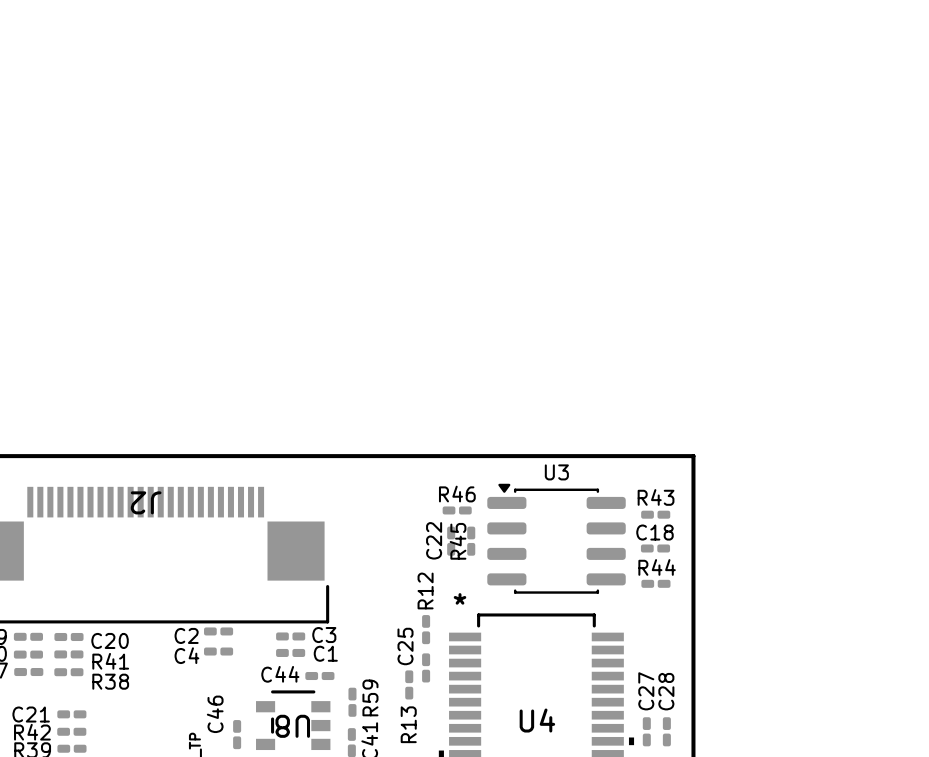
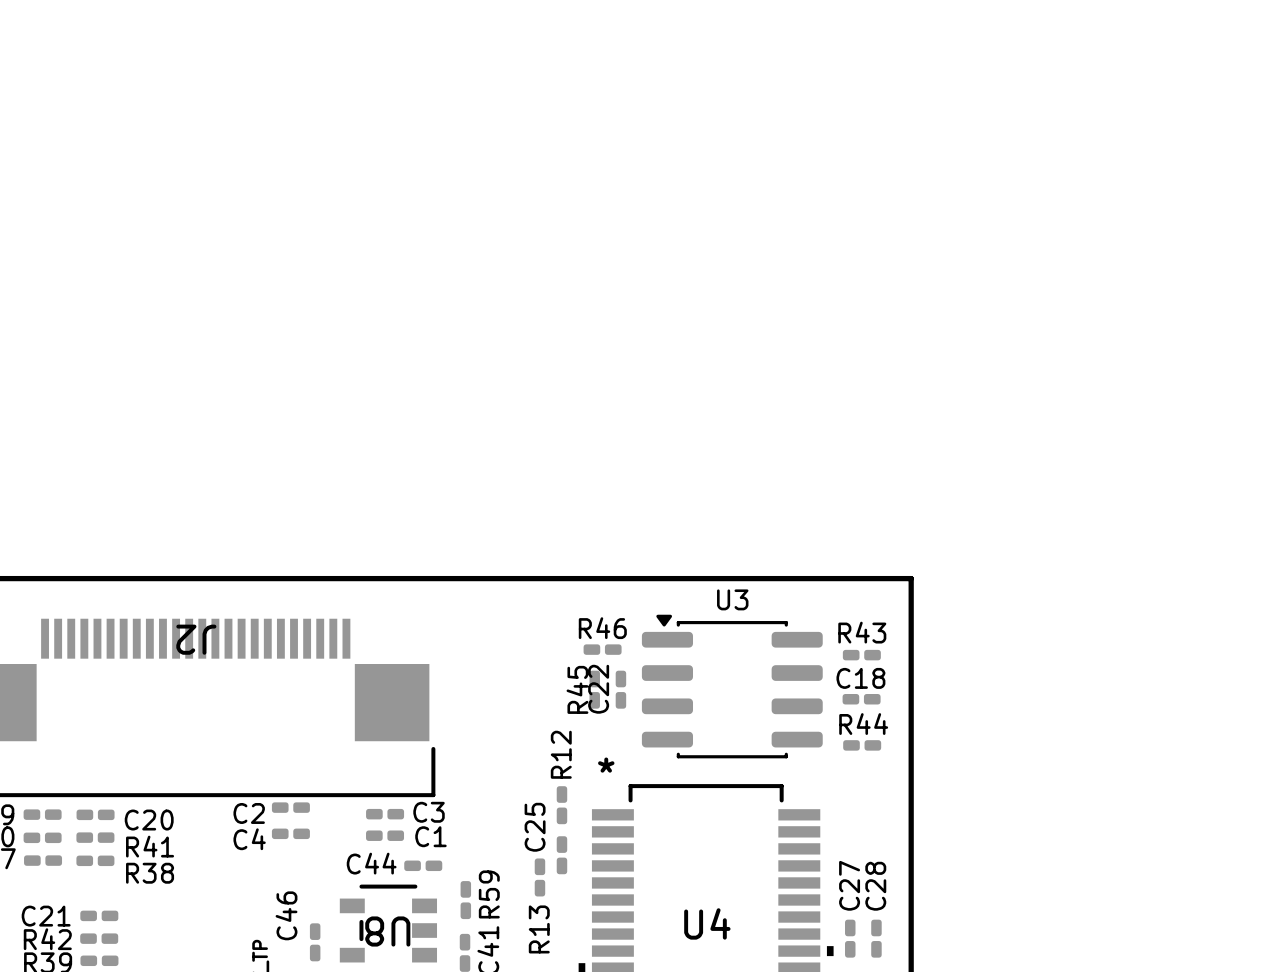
C22 name: C22 (434, 540) -> R45 (577, 689)
R45 name: R45 (458, 541) -> C22 (598, 689)

